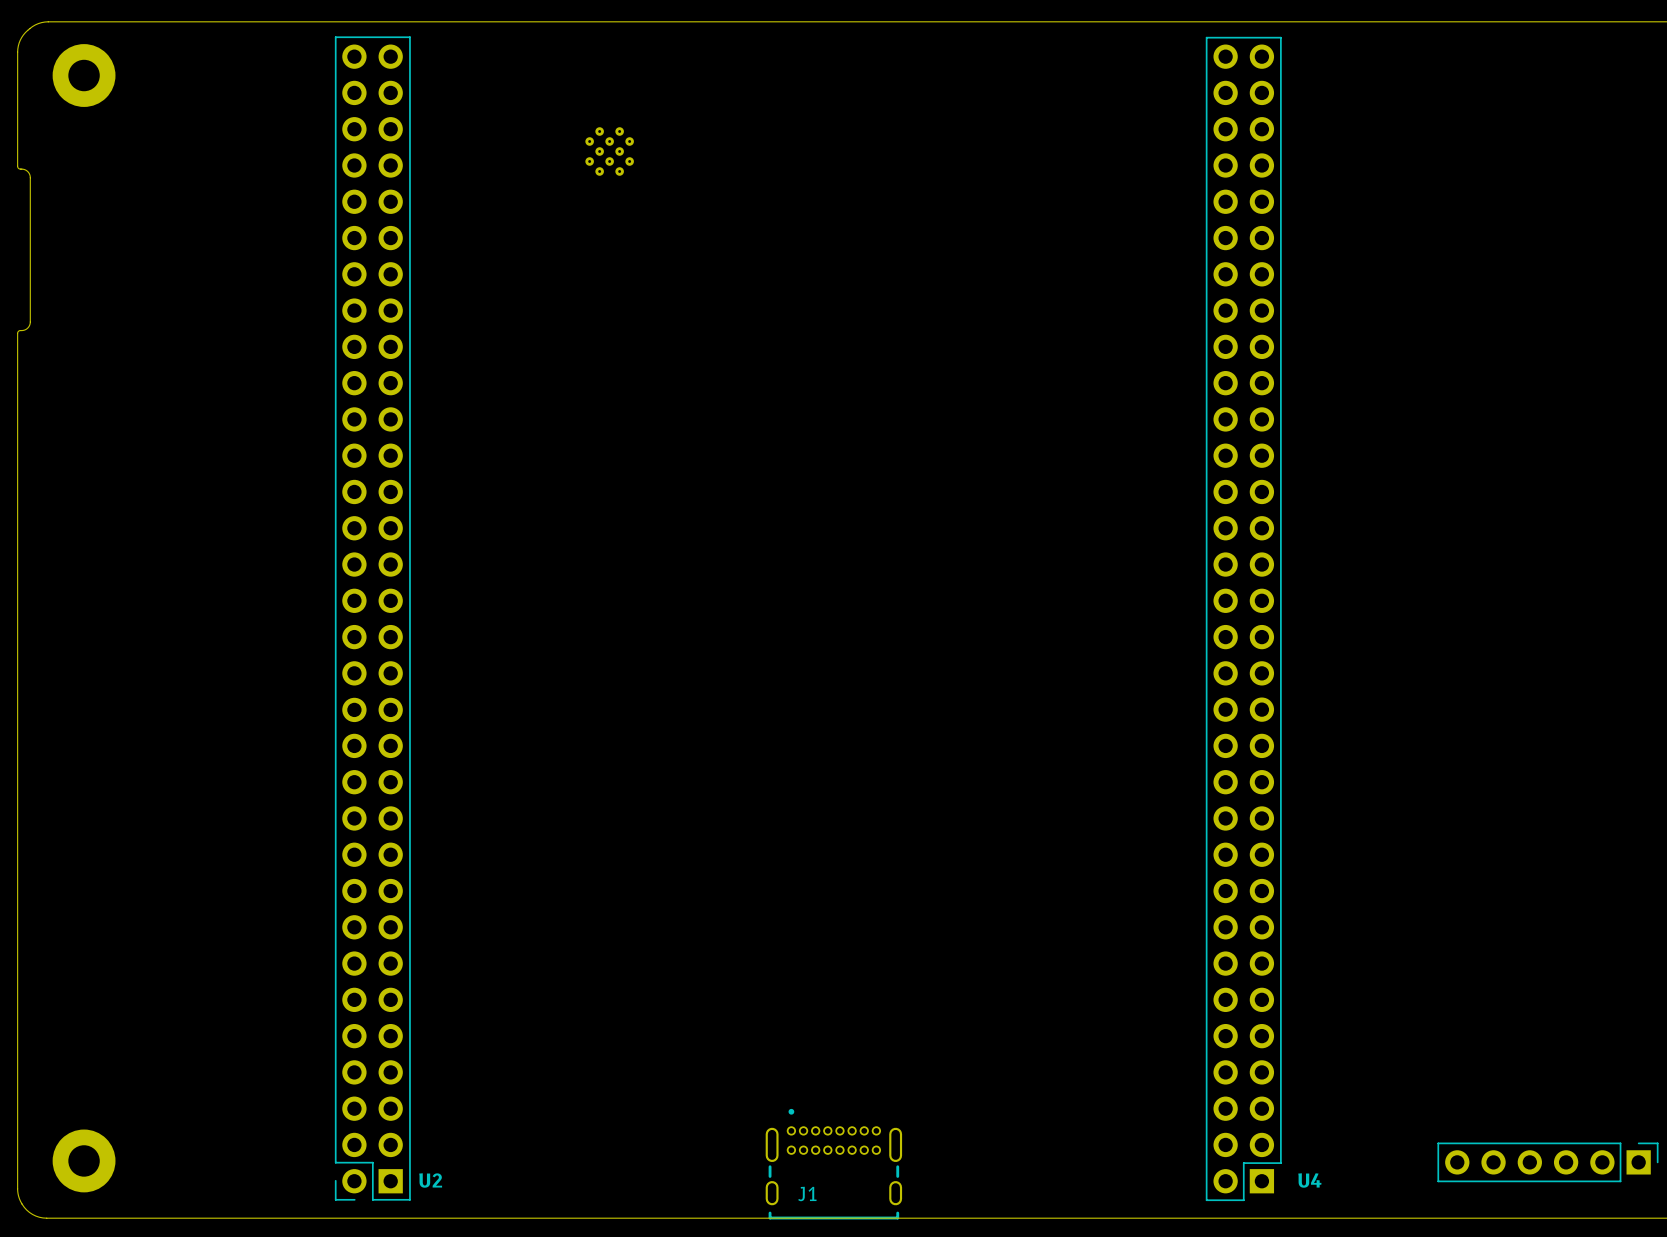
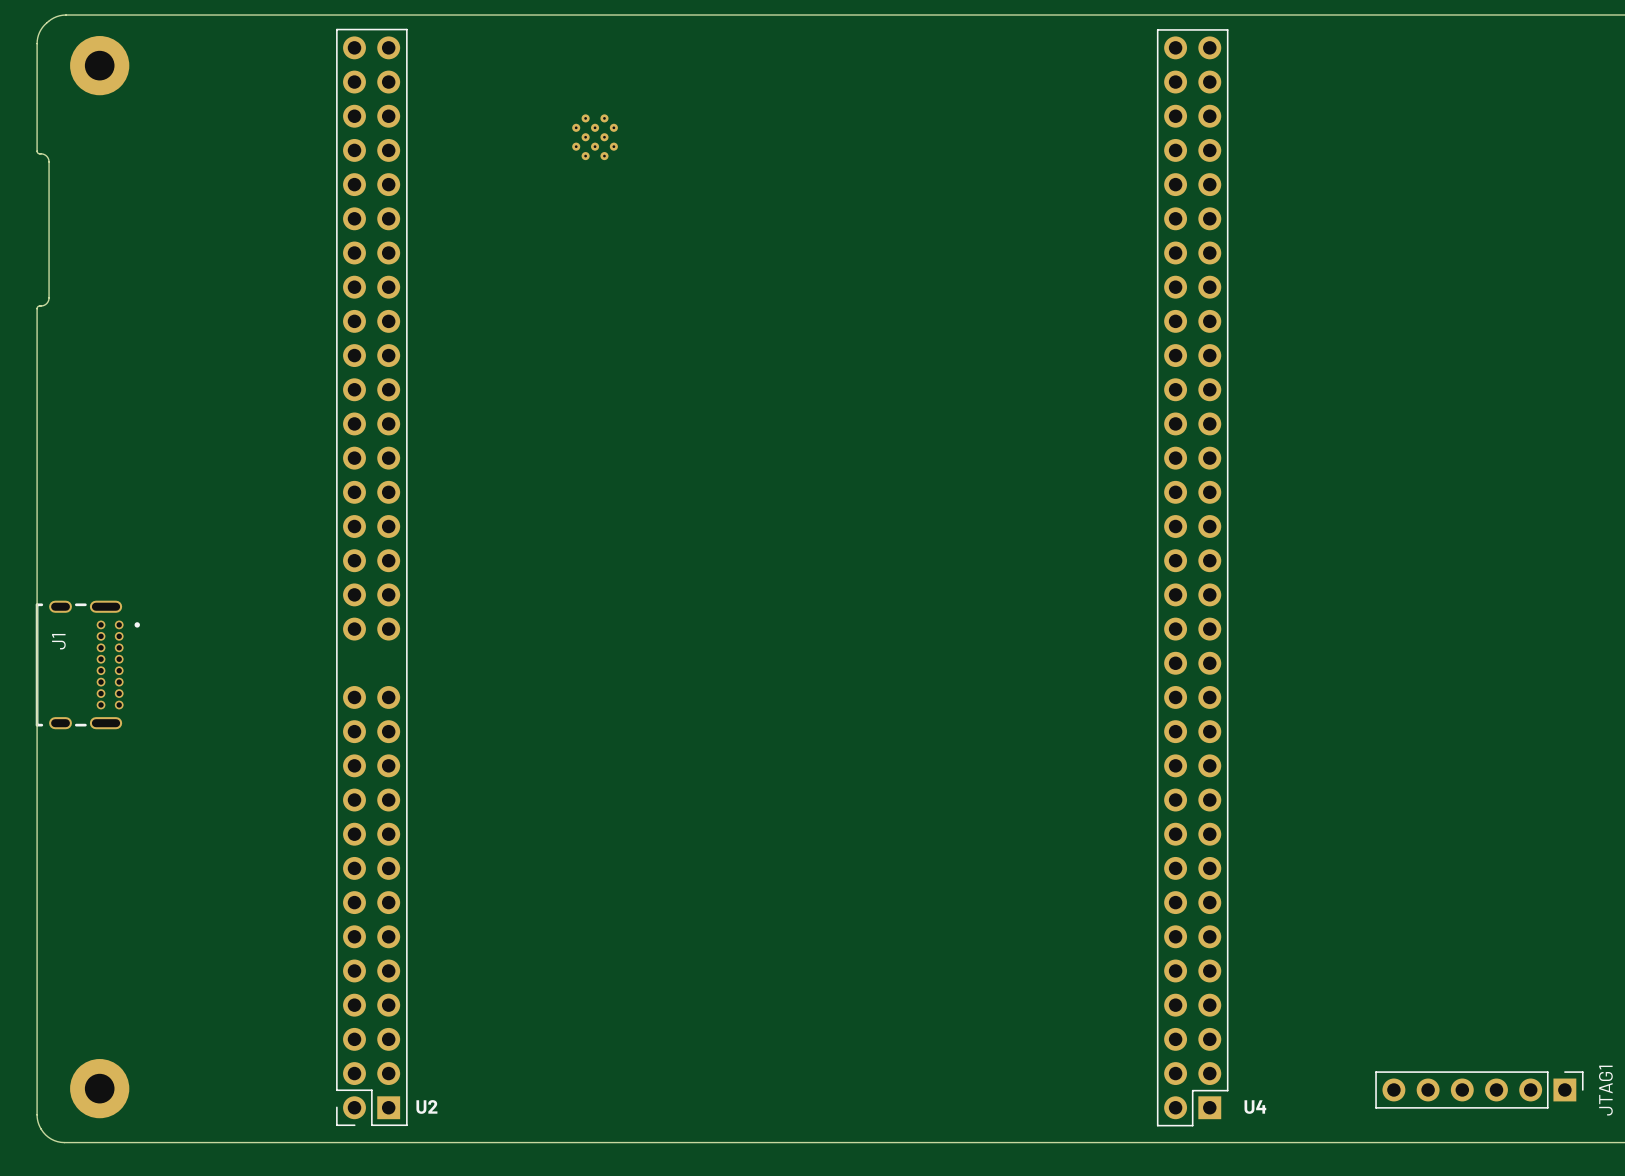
U2 footprint: [334, 36, 411, 1201] -> [336, 28, 408, 1127]
J1 rotation: 0° (833, 1164) -> 90° clockwise (87, 664)
J1 position: (833, 1164) -> (87, 664)

